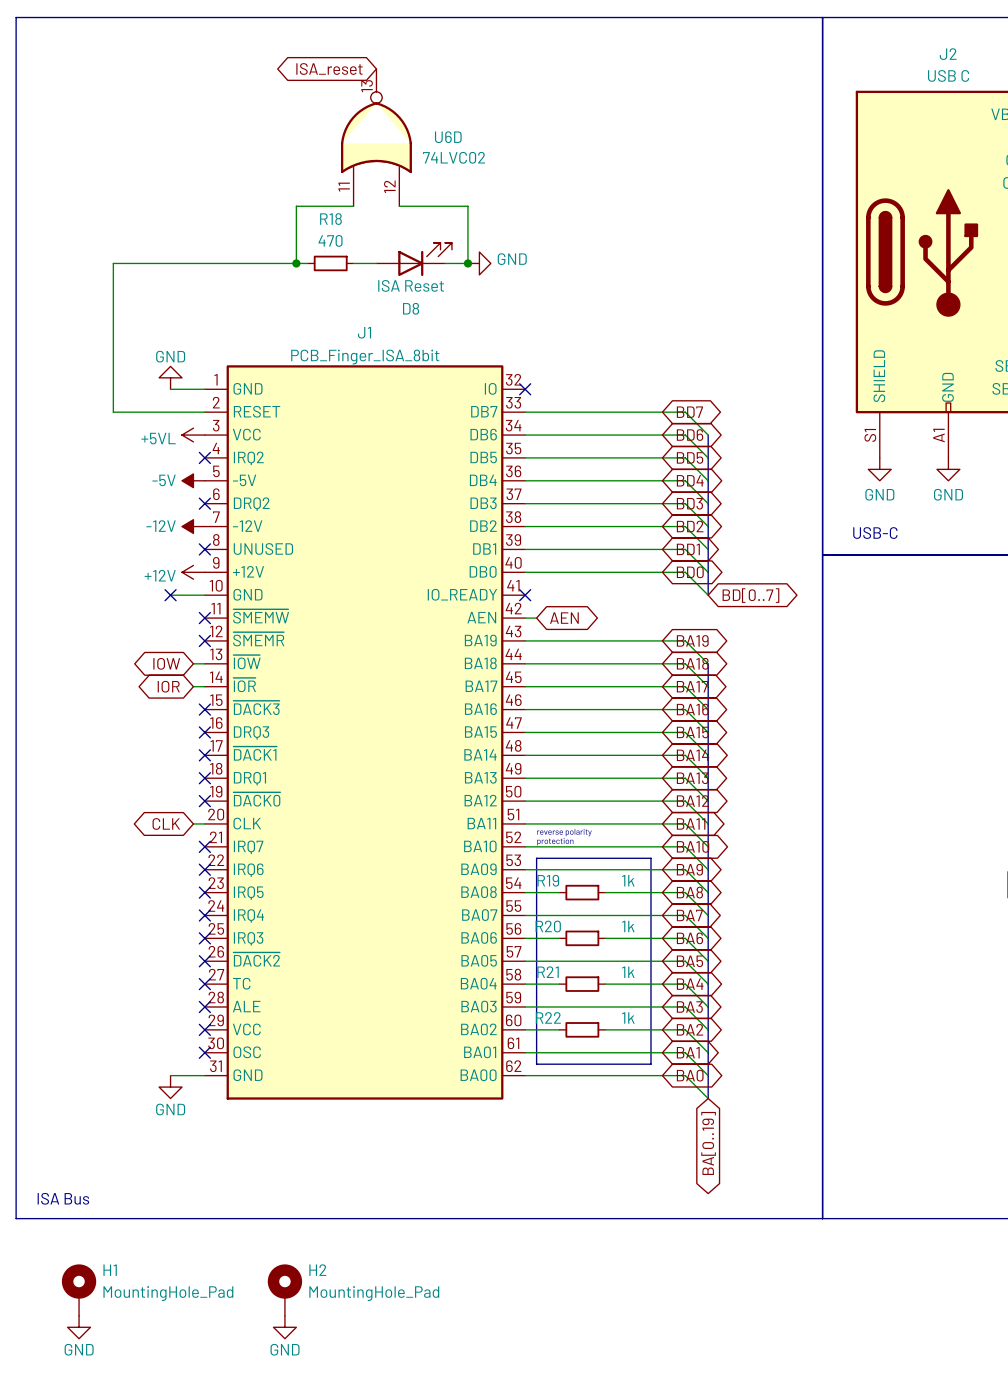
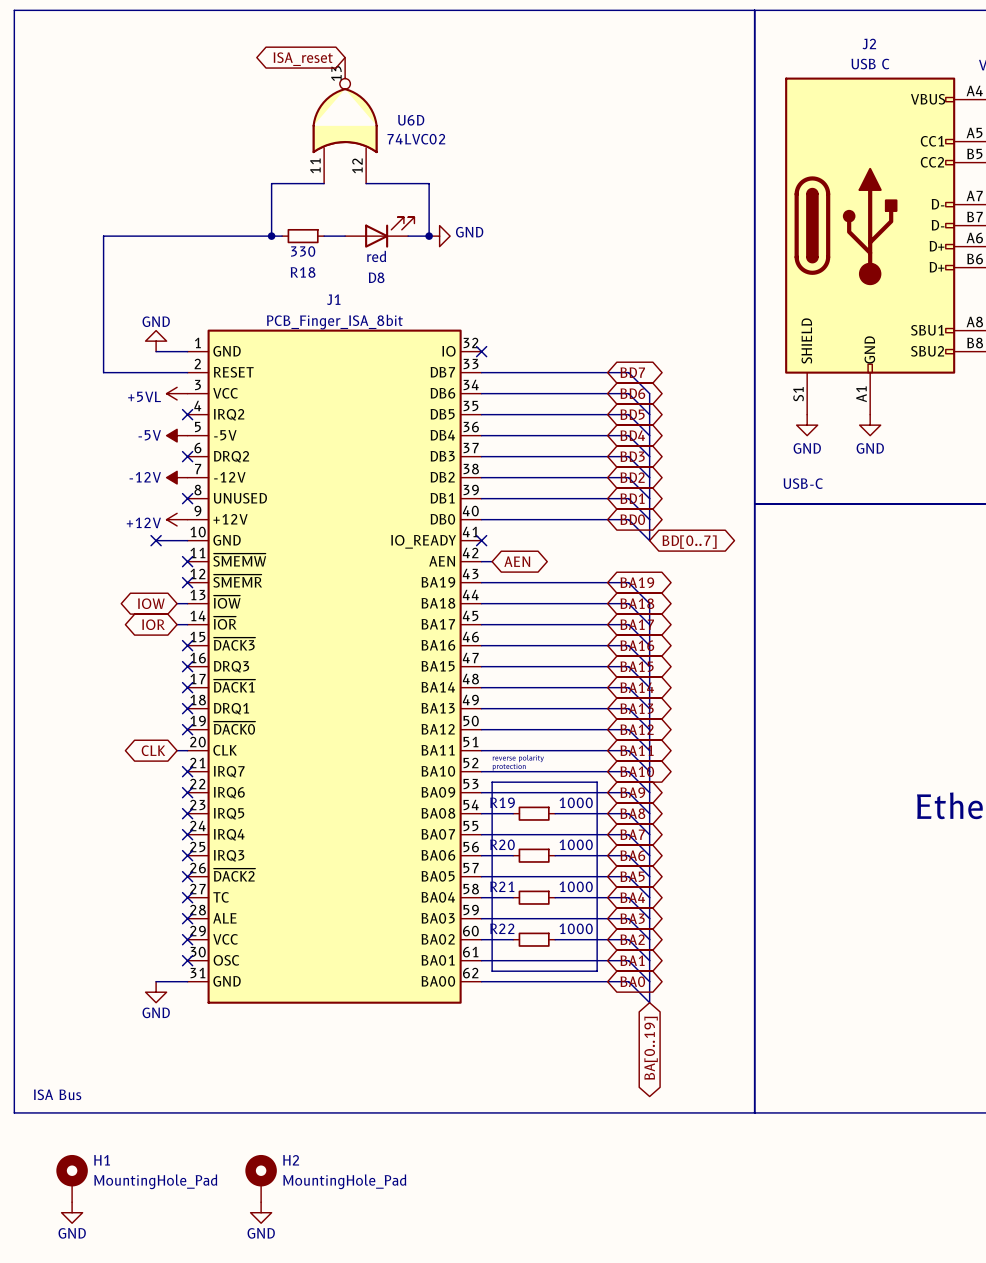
R18 name position: R18 (330, 219) -> R18 (303, 272)
R18 value: 470 (330, 240) -> 330 (303, 251)
D8 value: ISA Reset (411, 285) -> red (376, 256)
R19 value: 1k (628, 880) -> 1000 (576, 802)
R20 value: 1k (628, 926) -> 1000 (576, 844)
R21 value: 1k (628, 972) -> 1000 (576, 886)
R22 value: 1k (628, 1018) -> 1000 (576, 928)

